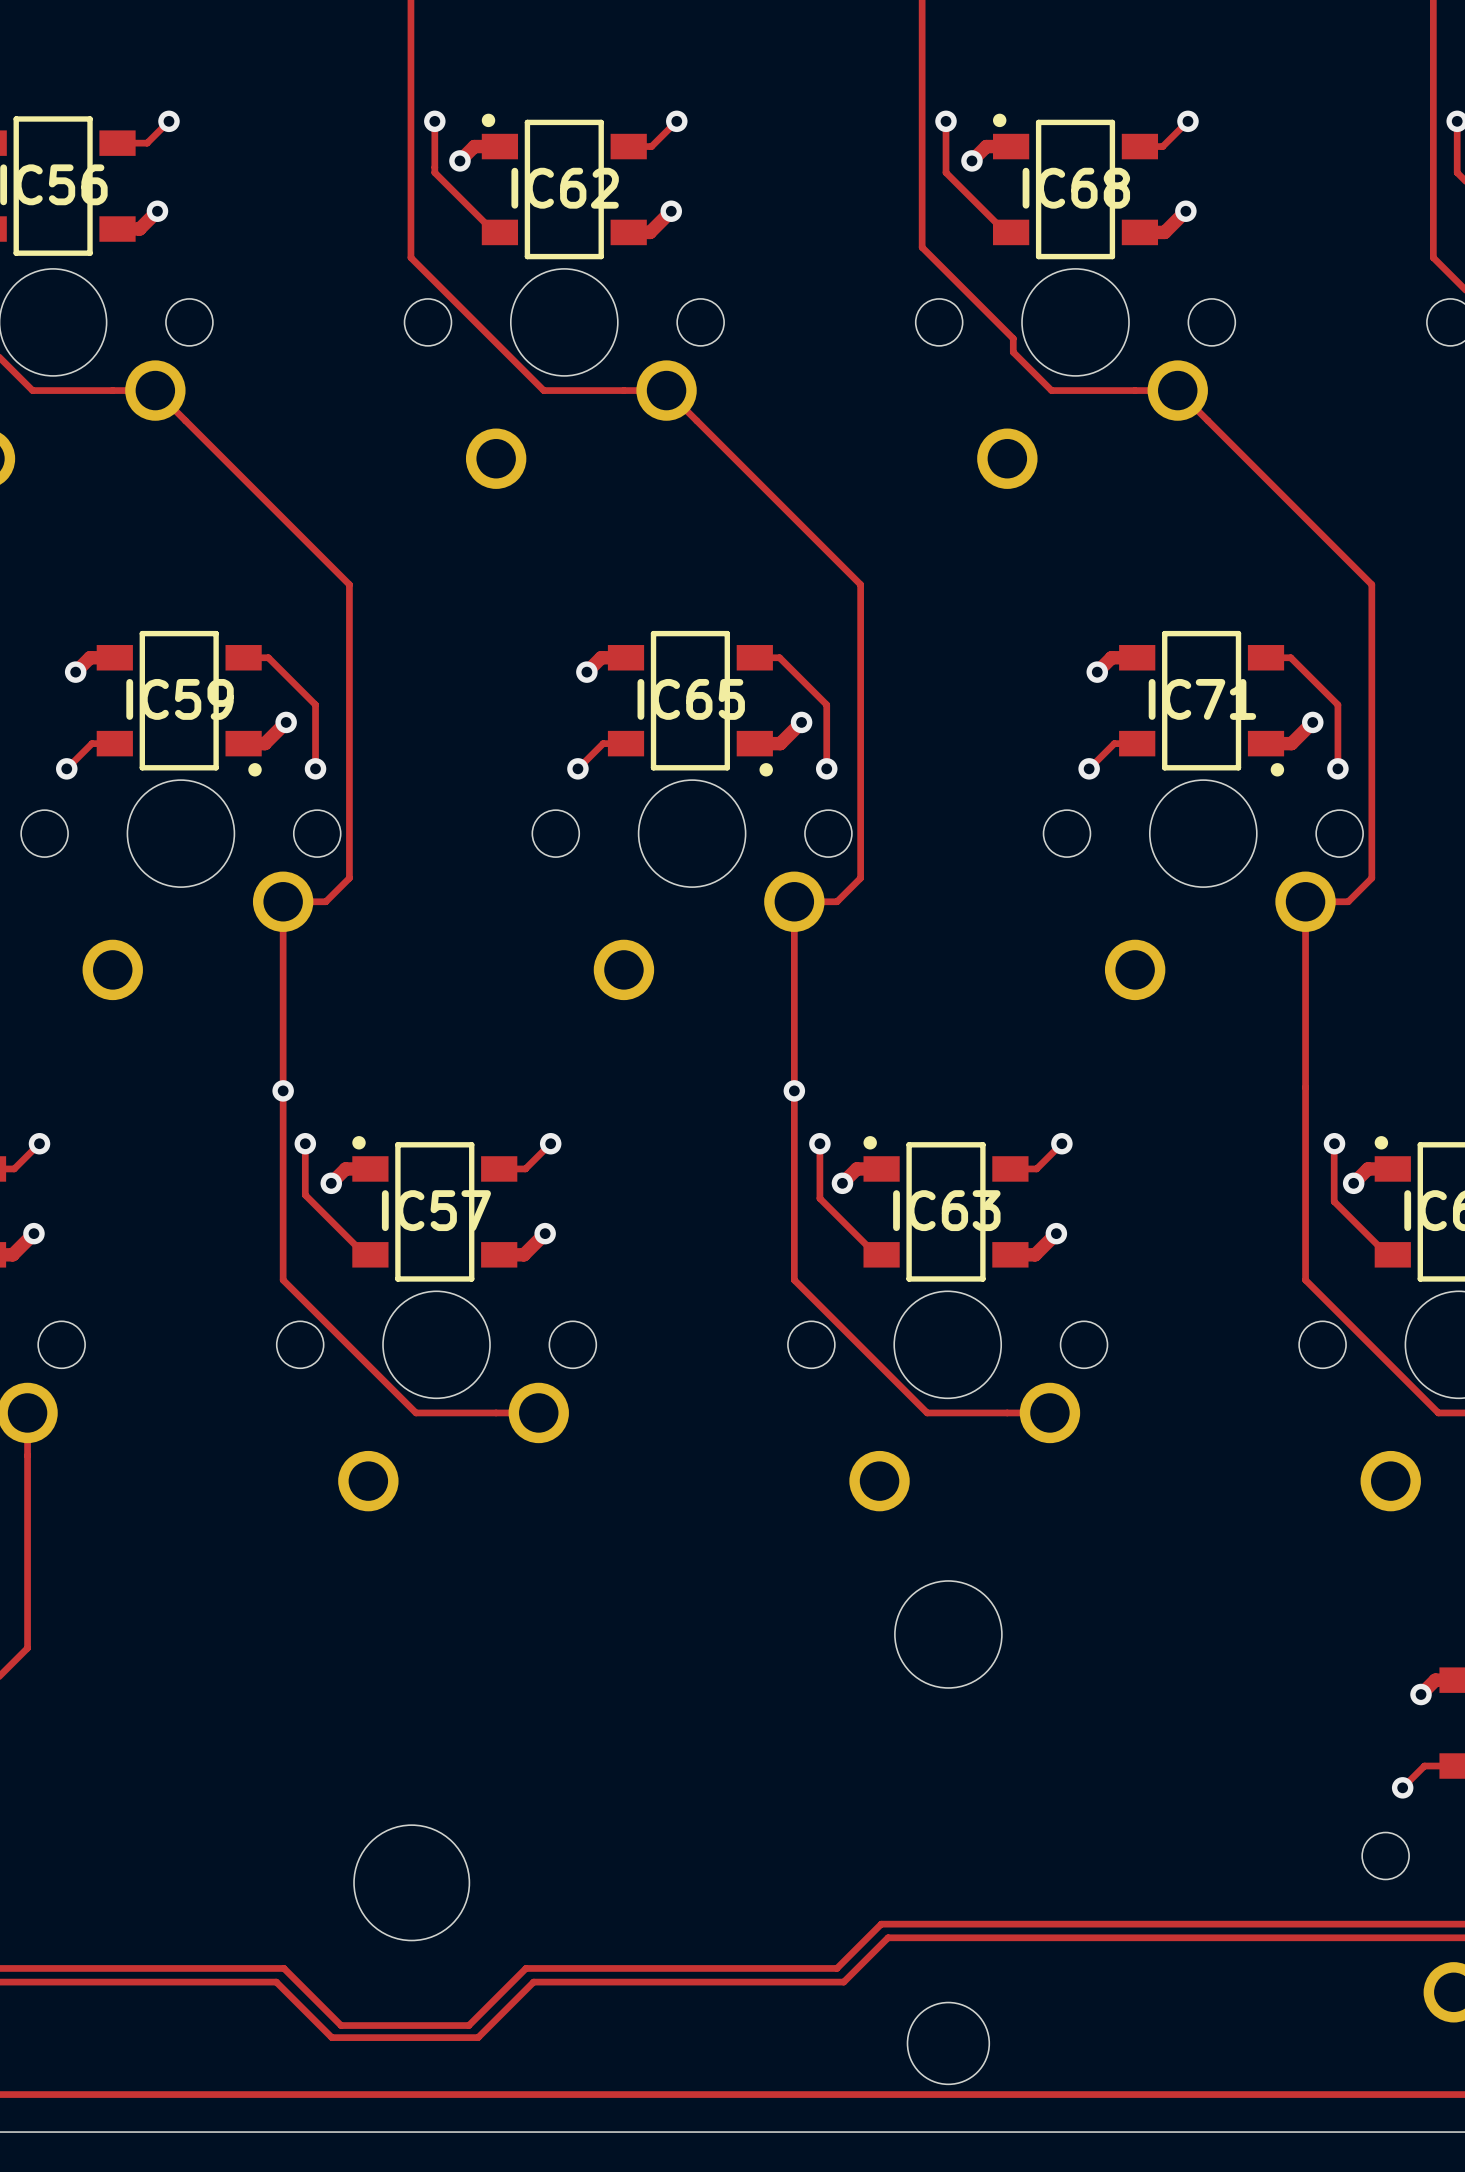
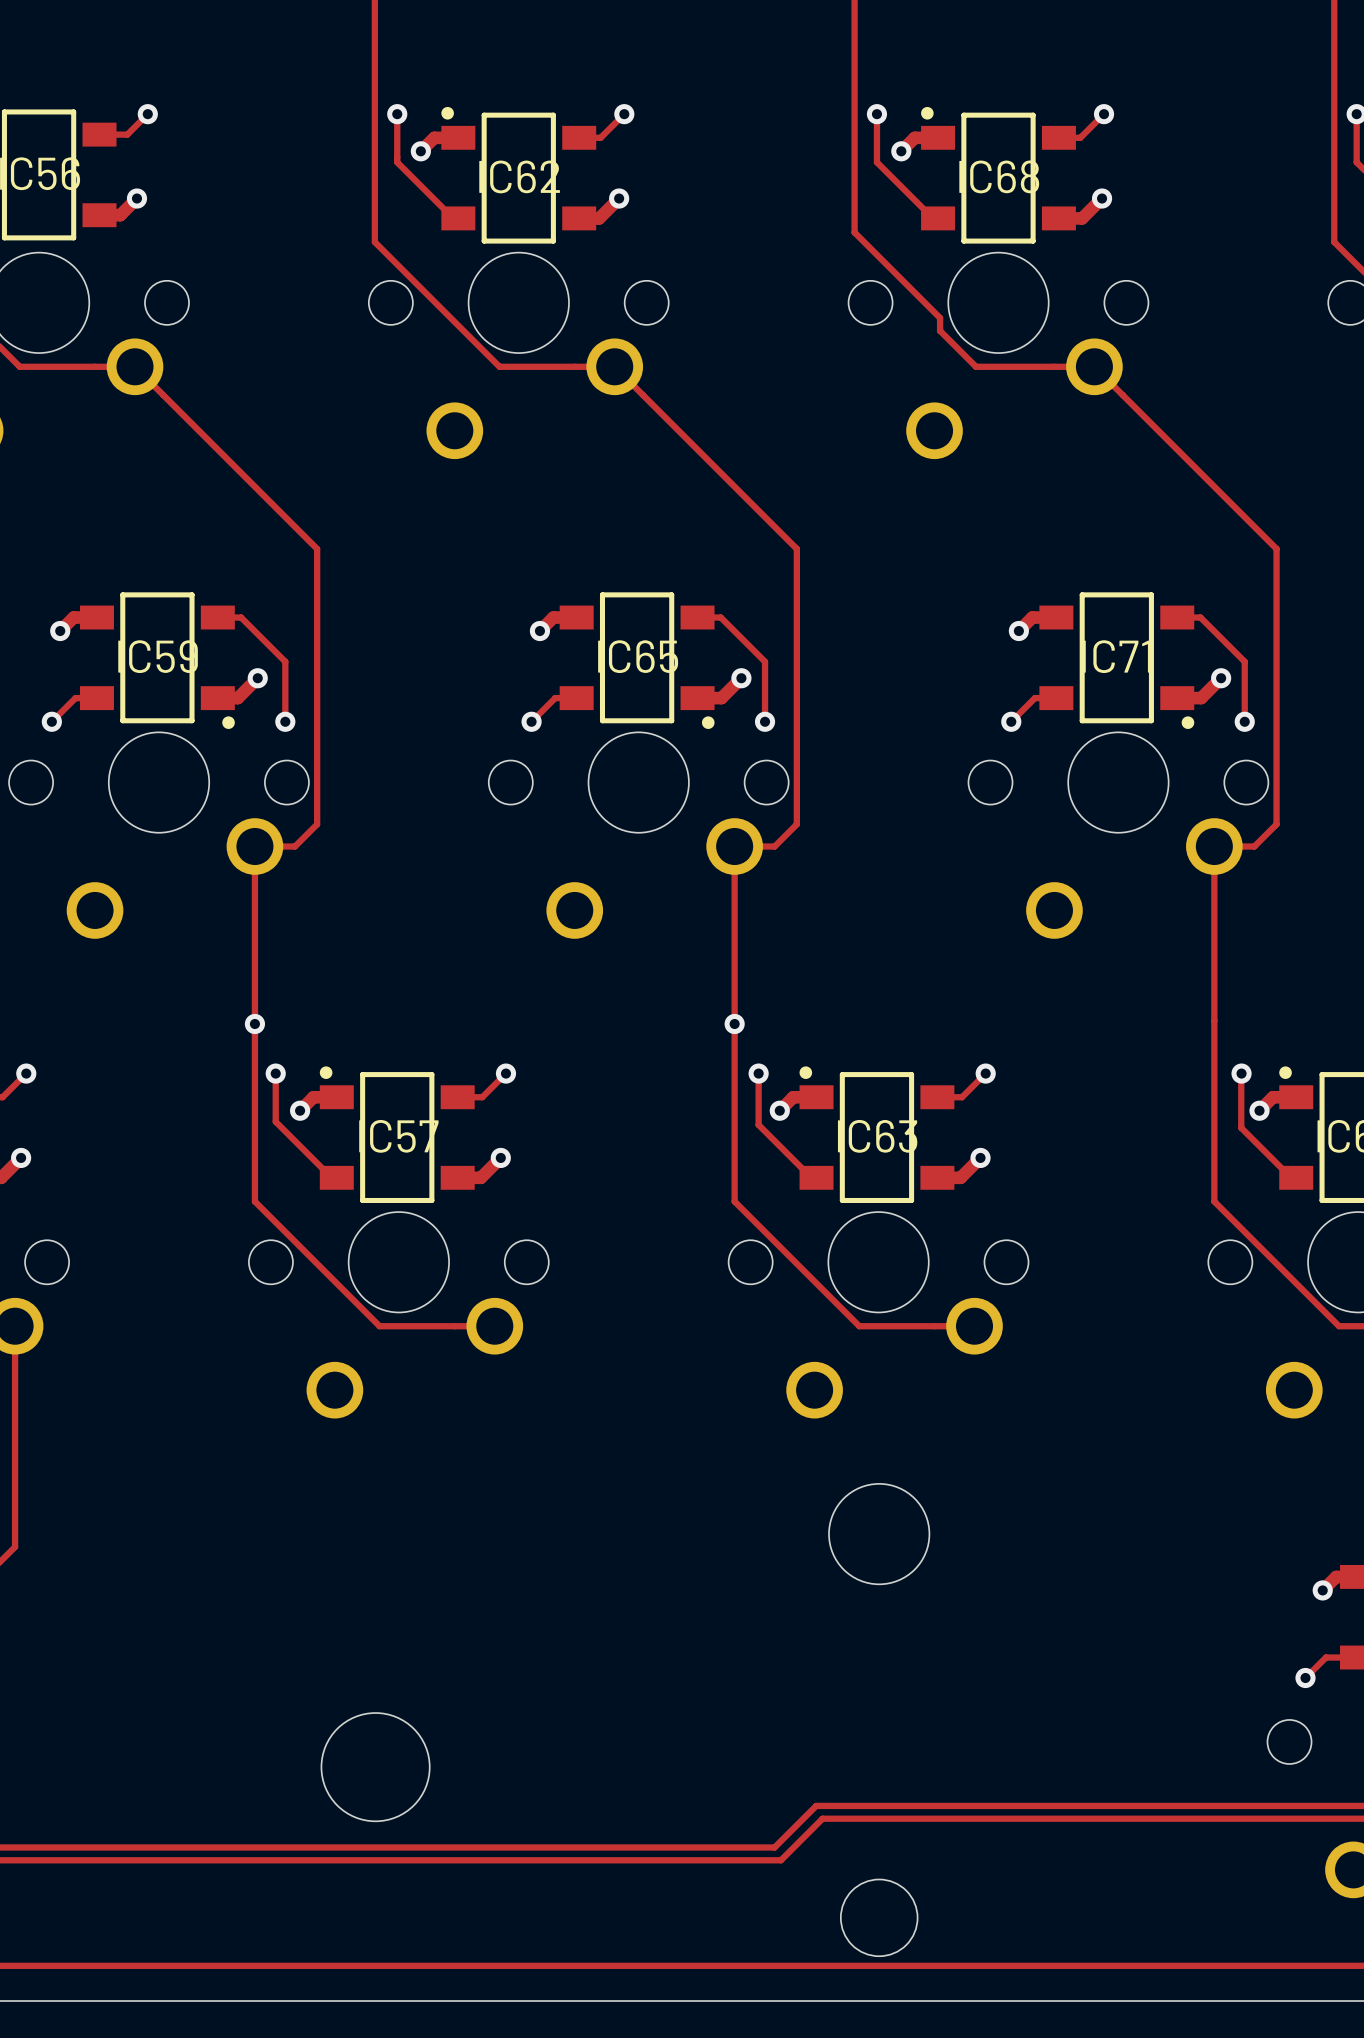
track: (284, 1968) (341, 2025) (468, 2025) (525, 1968) -> (255, 1847) (482, 1847)
track: (276, 1982) (331, 2037) (478, 2037) (533, 1982) -> (248, 1860) (490, 1860)

